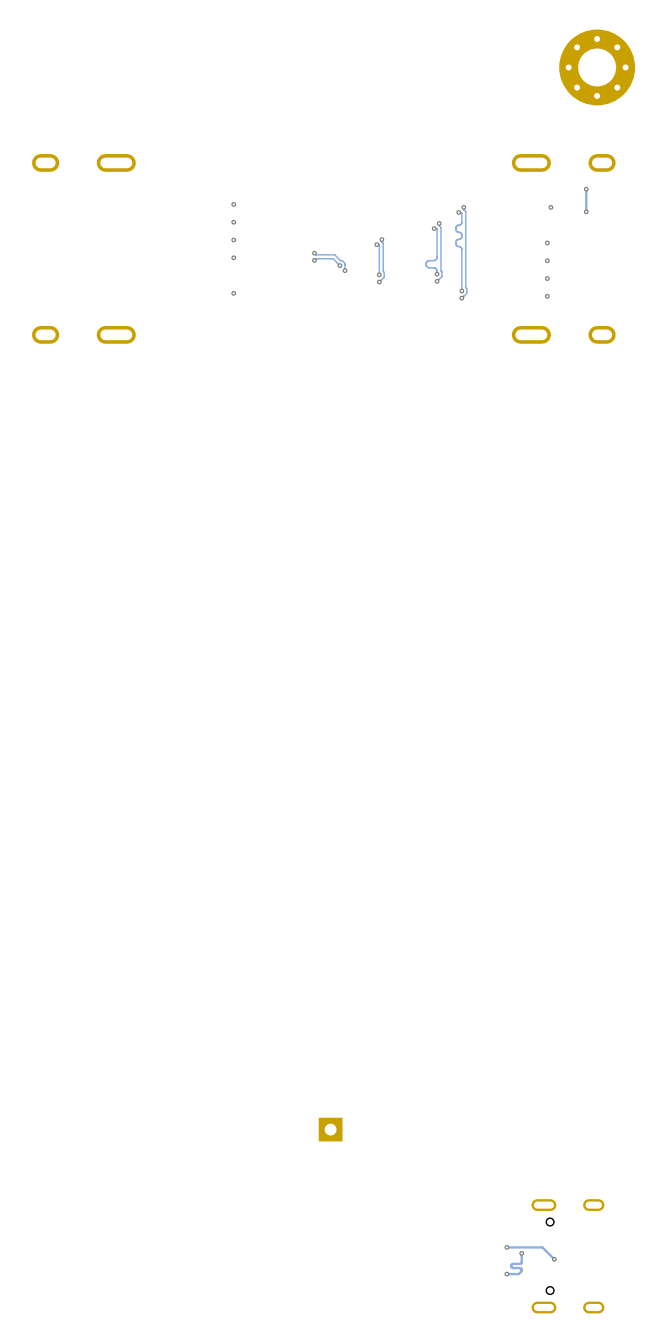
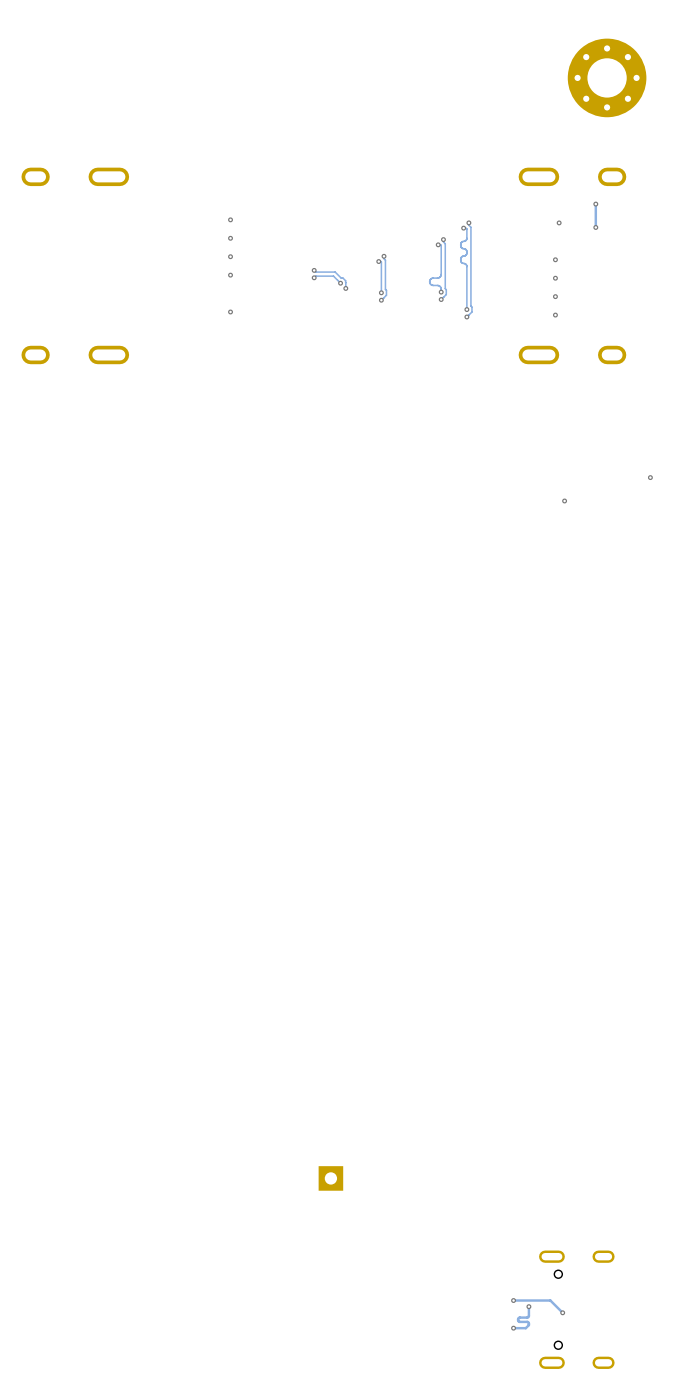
via: none -> (650, 477)
via: none -> (564, 500)

